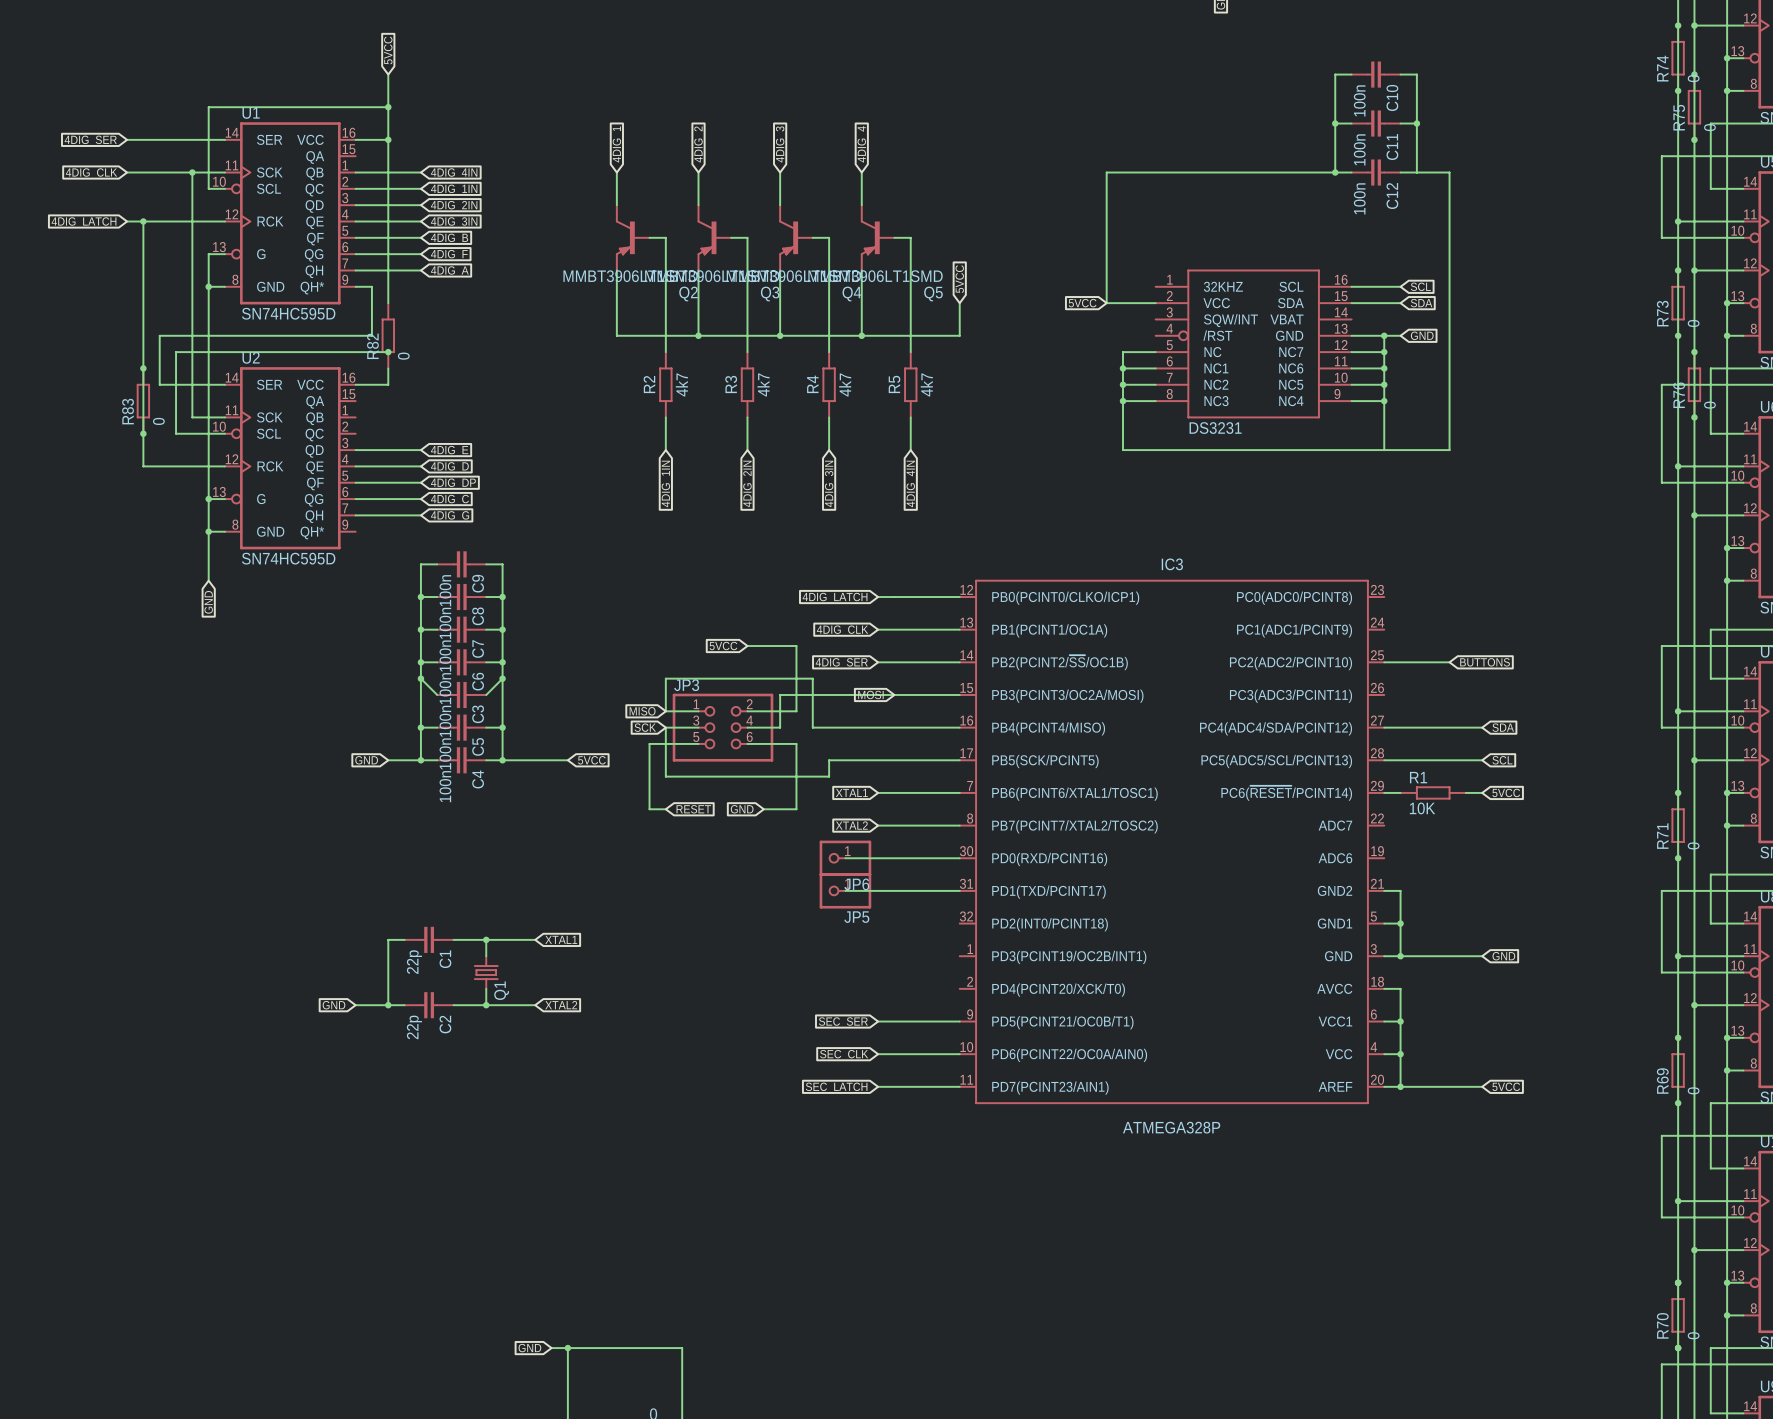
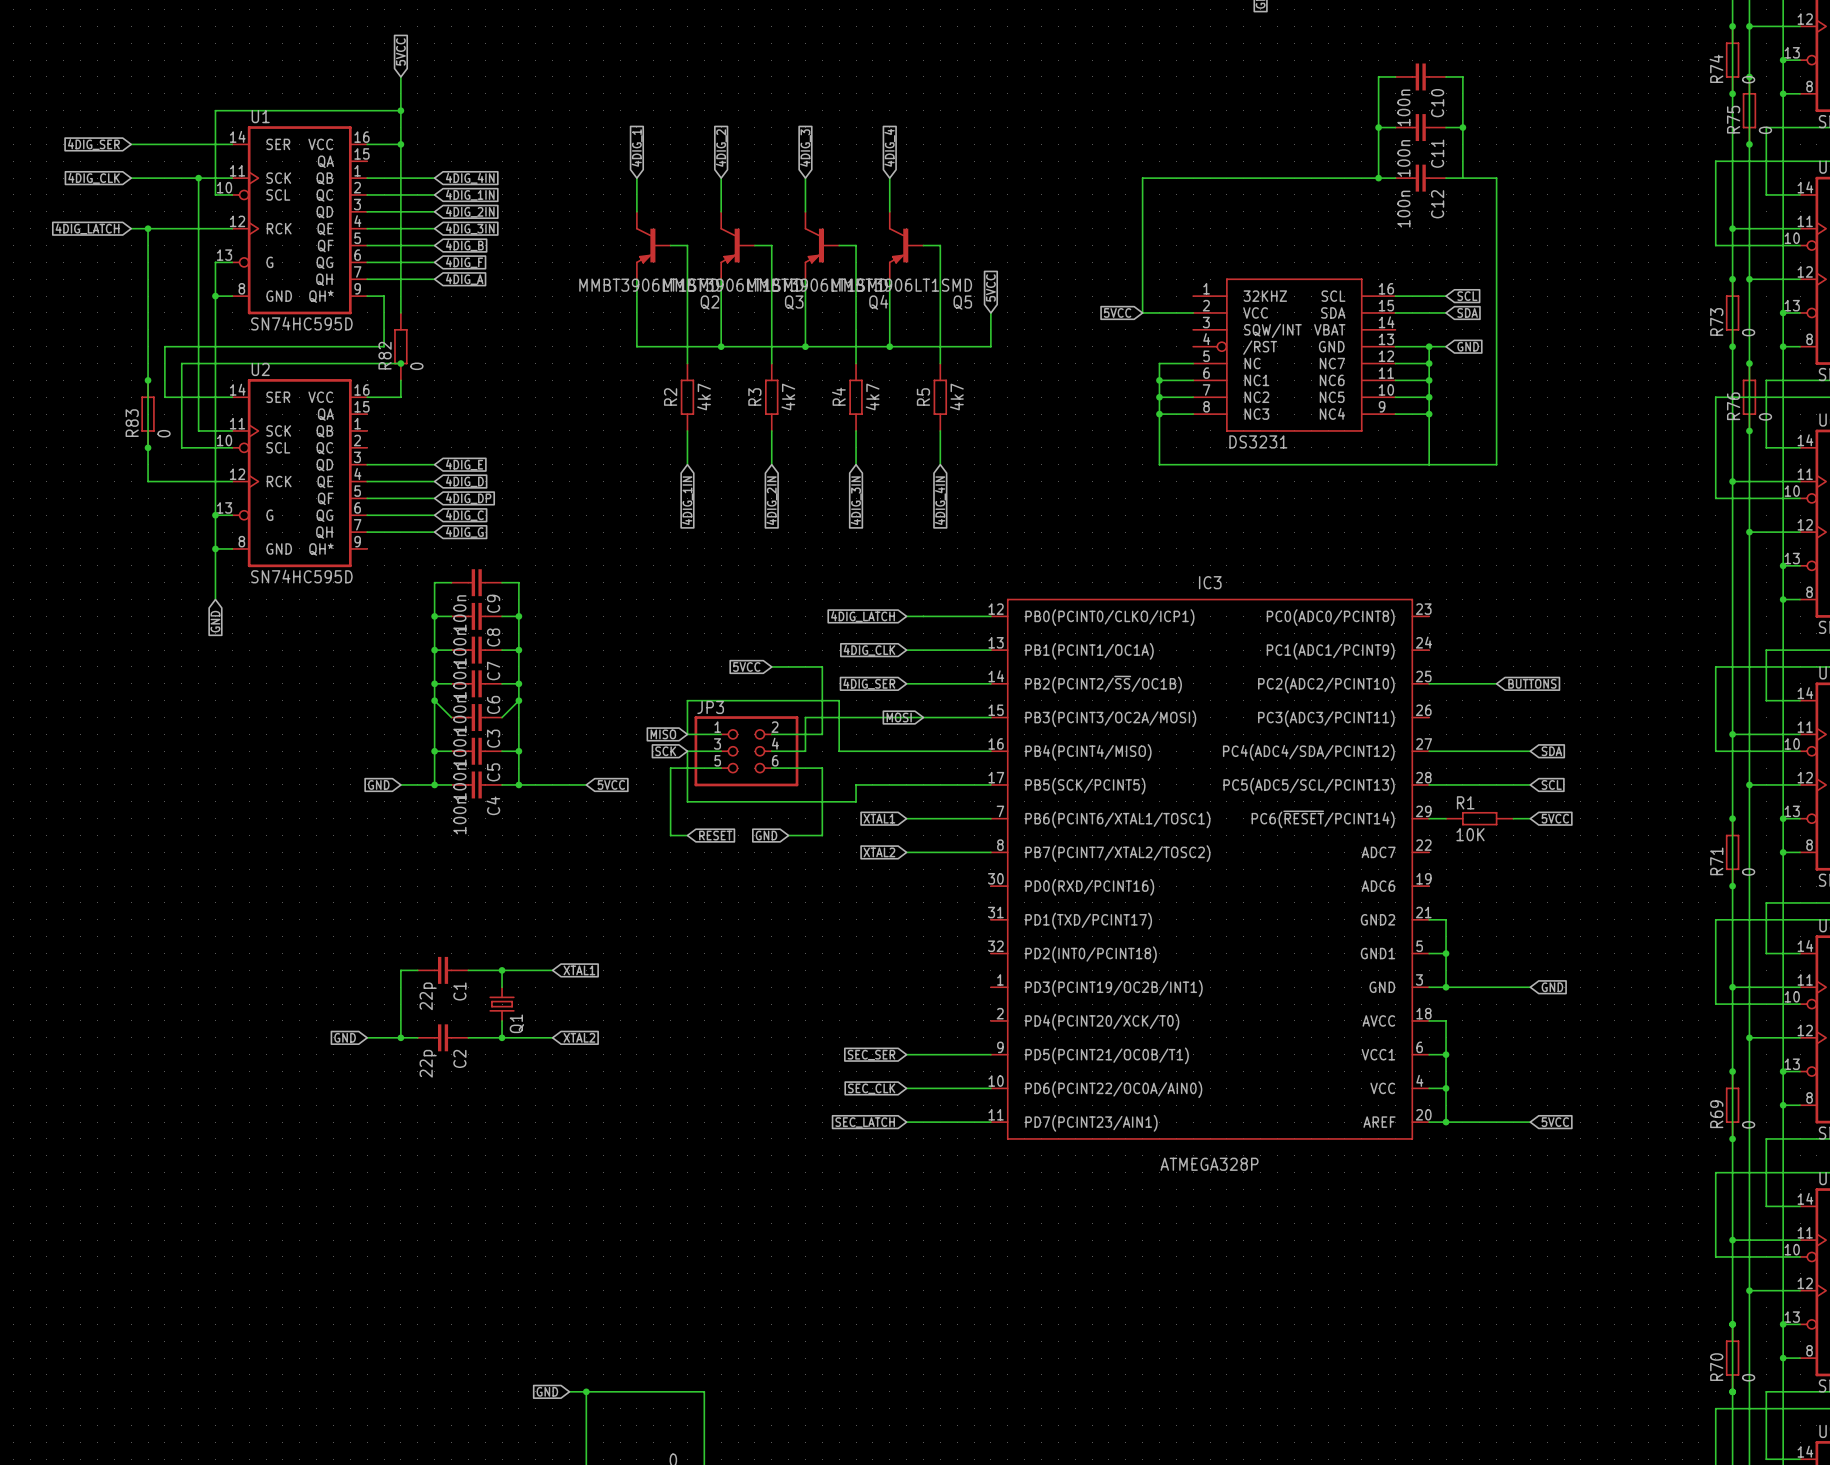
wire: (845, 858) (959, 858) -> none
JP6: (845, 858) -> none
wire: (845, 890) (959, 890) -> none
JP5: (845, 890) -> none

